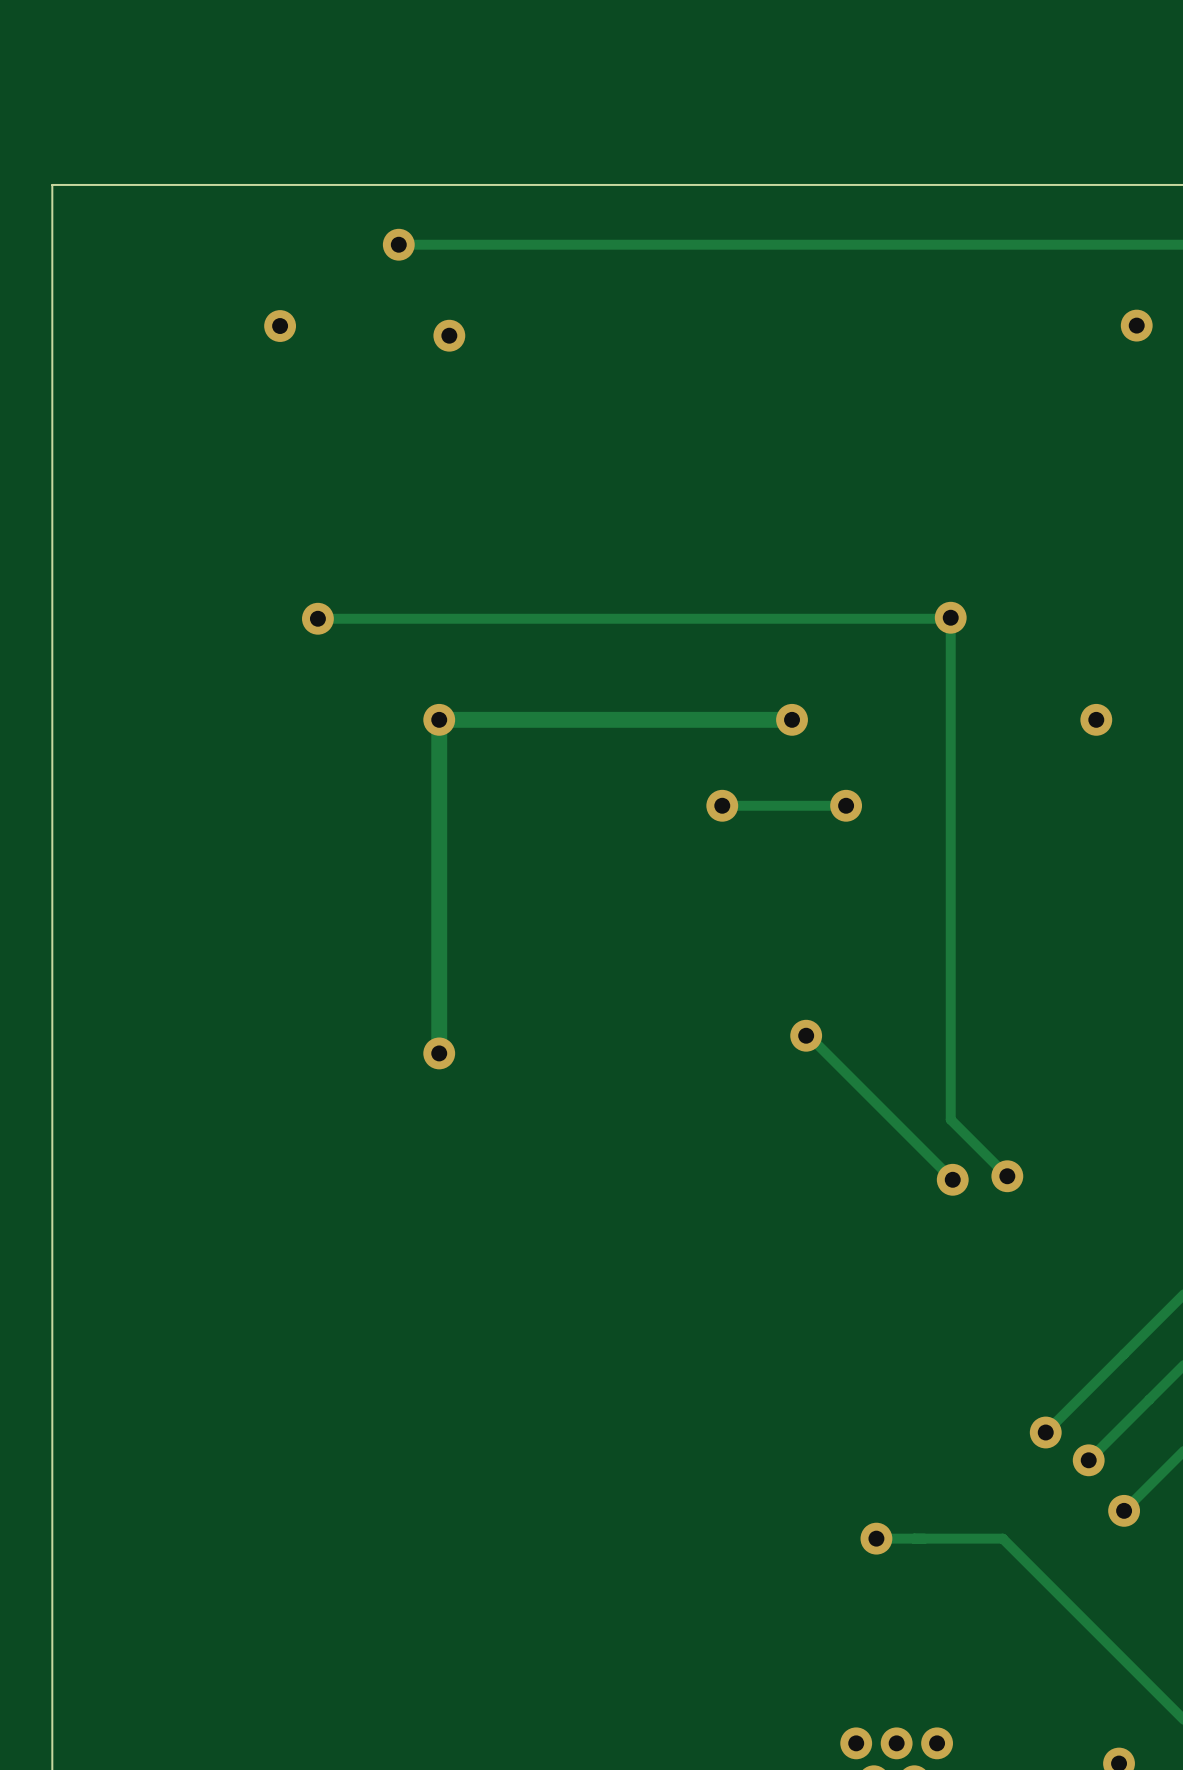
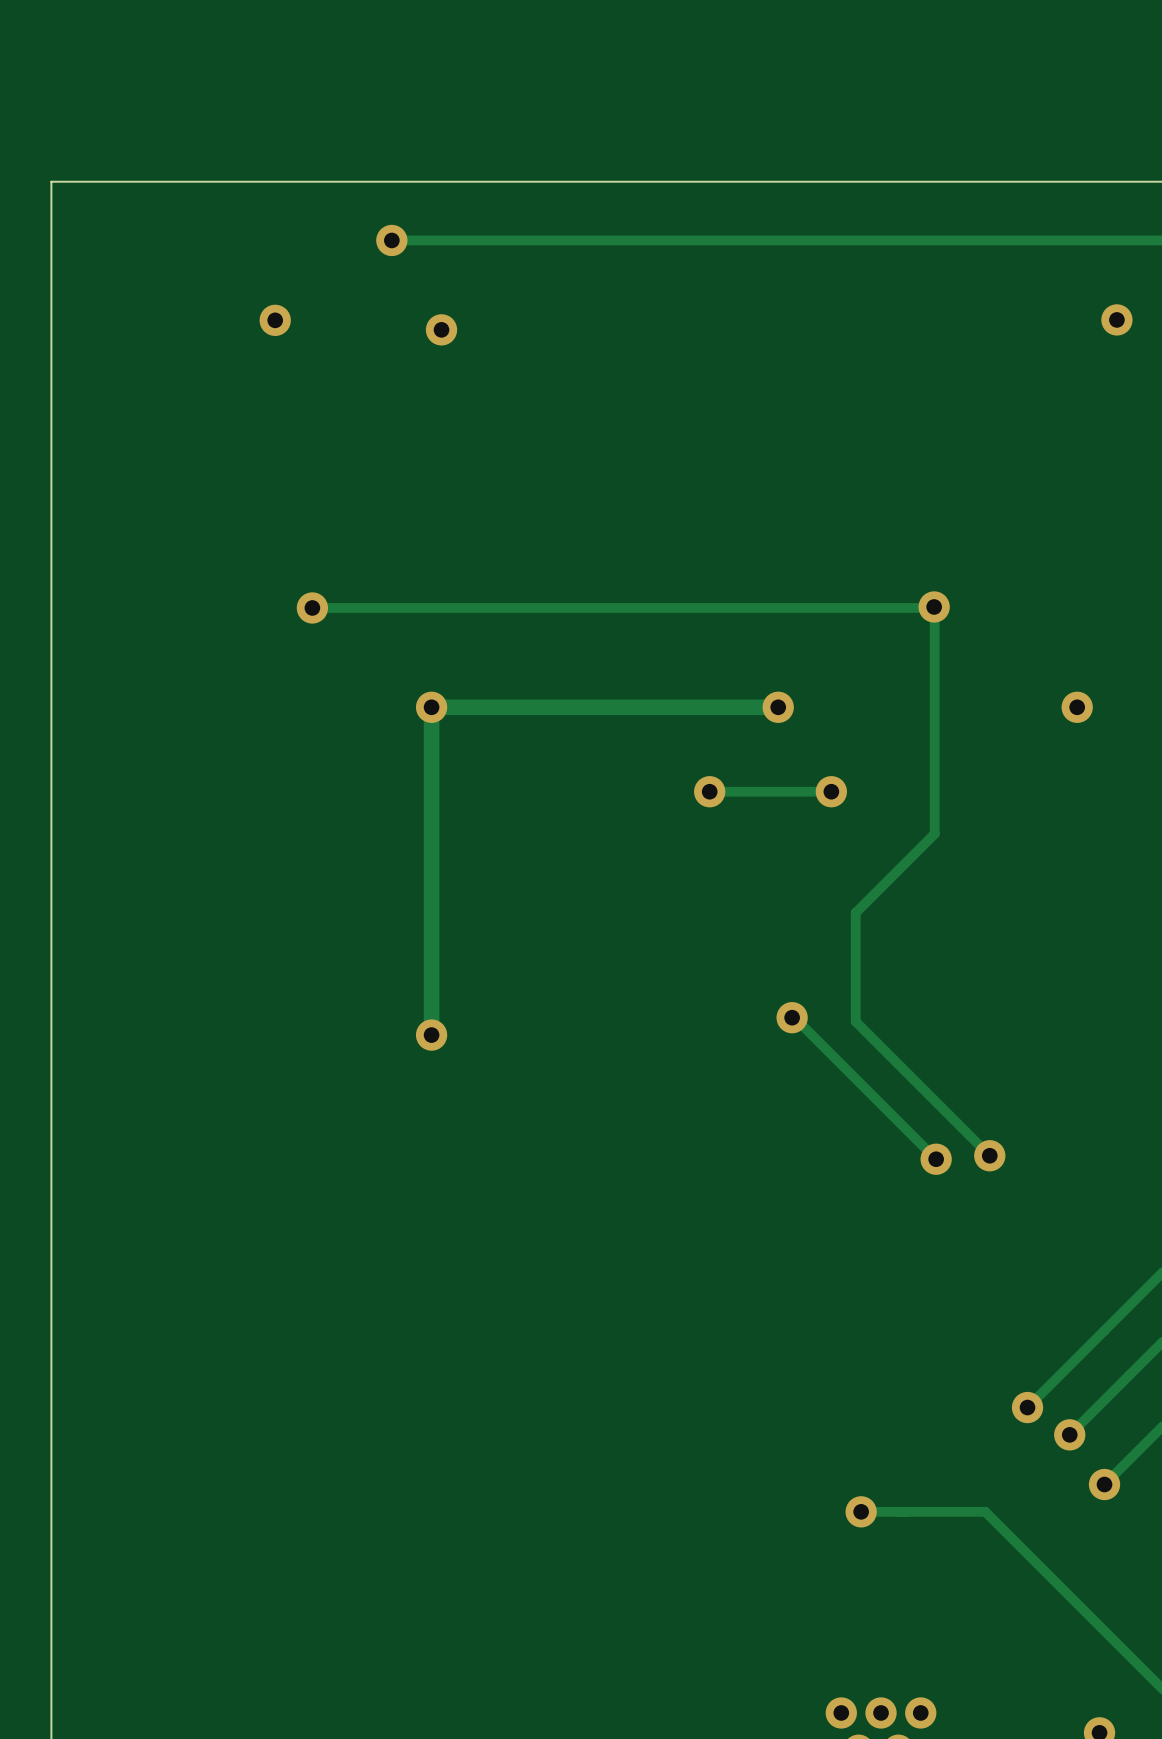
track: (950, 617) (950, 1119) -> (934, 609) (934, 833) (855, 912) (855, 1021) (934, 1100)

